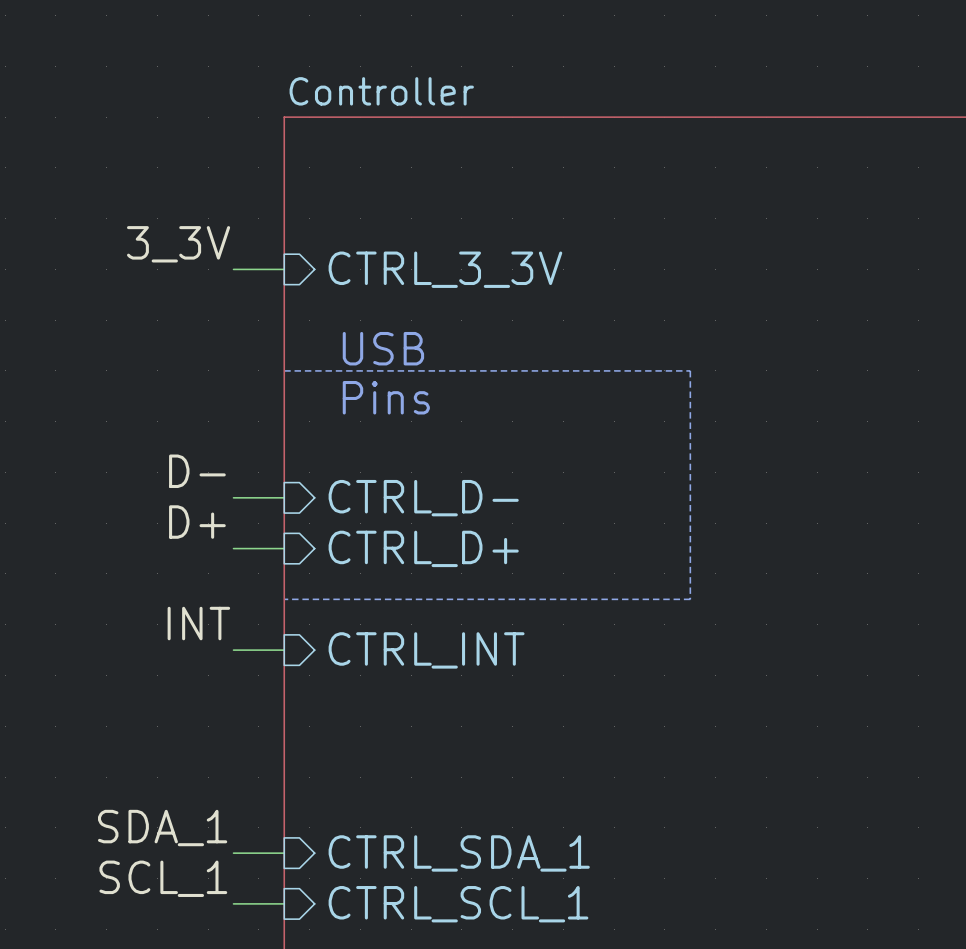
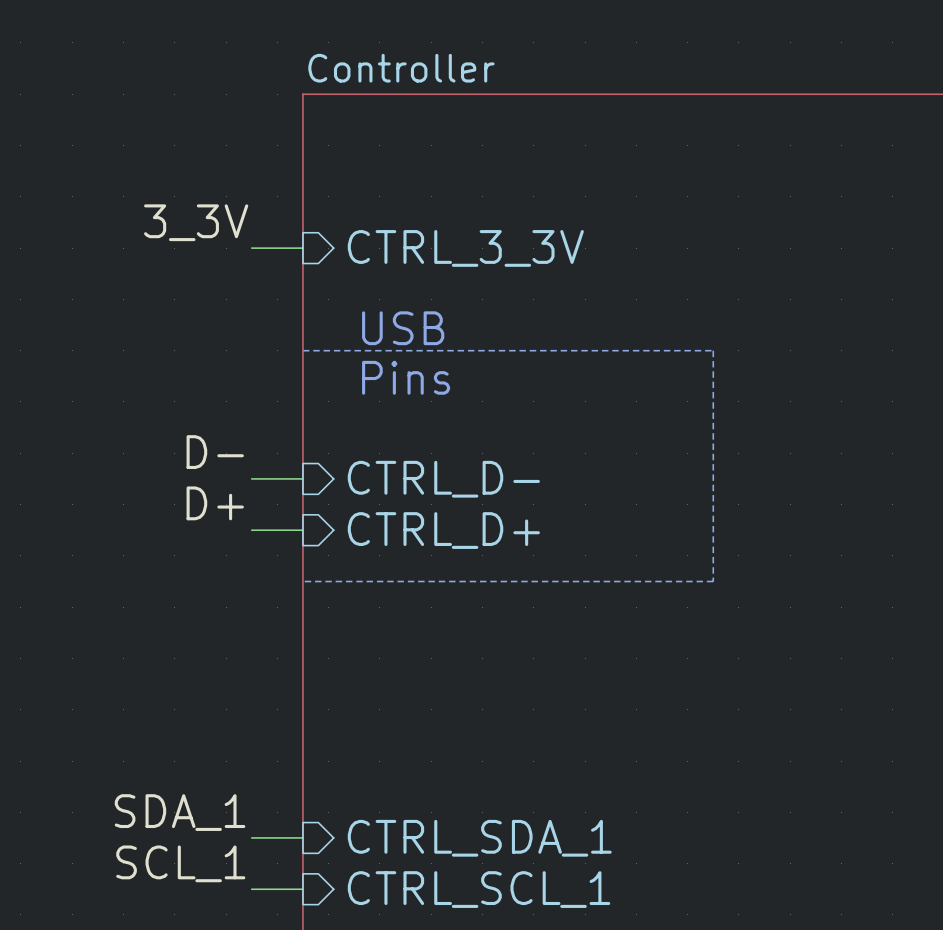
label: INT (198, 623) -> none
wire: (233, 650) (284, 650) -> none
sheet pin: CTRL_INT (426, 650) -> none

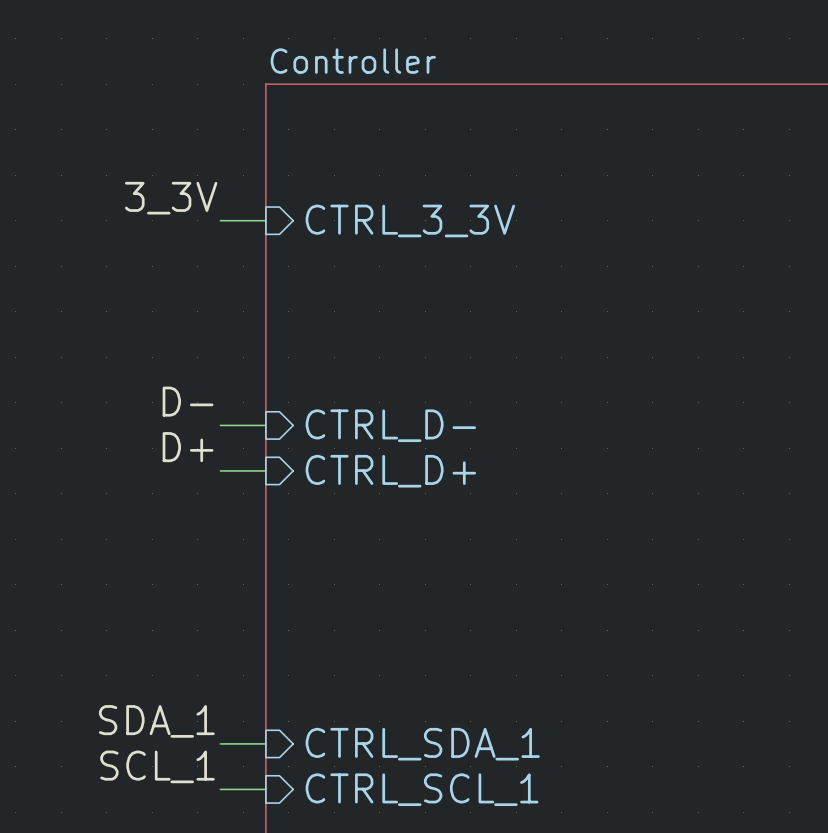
text: USB (403, 328) -> none
line: (302, 350) (713, 350) (713, 581) (302, 581) -> none
text: Pins (406, 377) -> none

